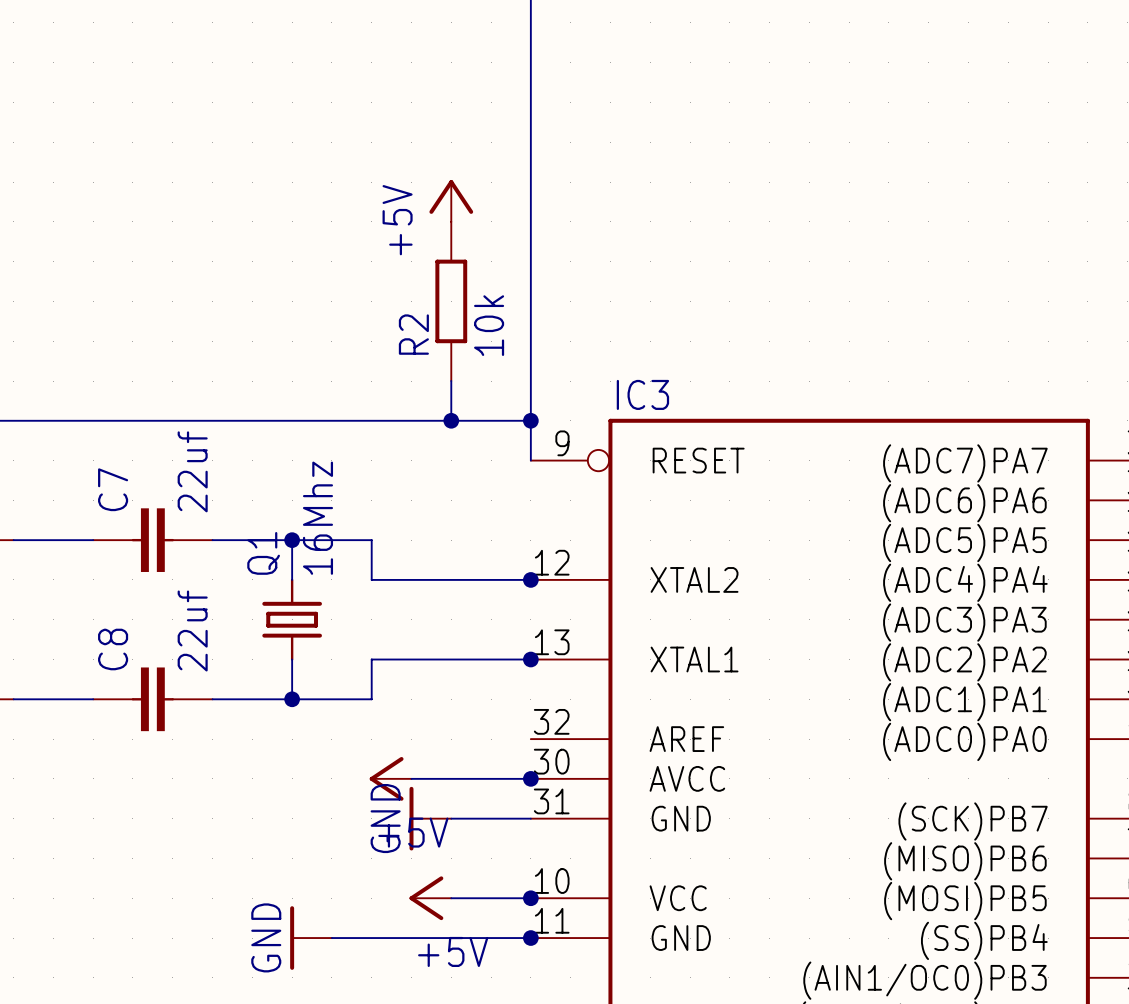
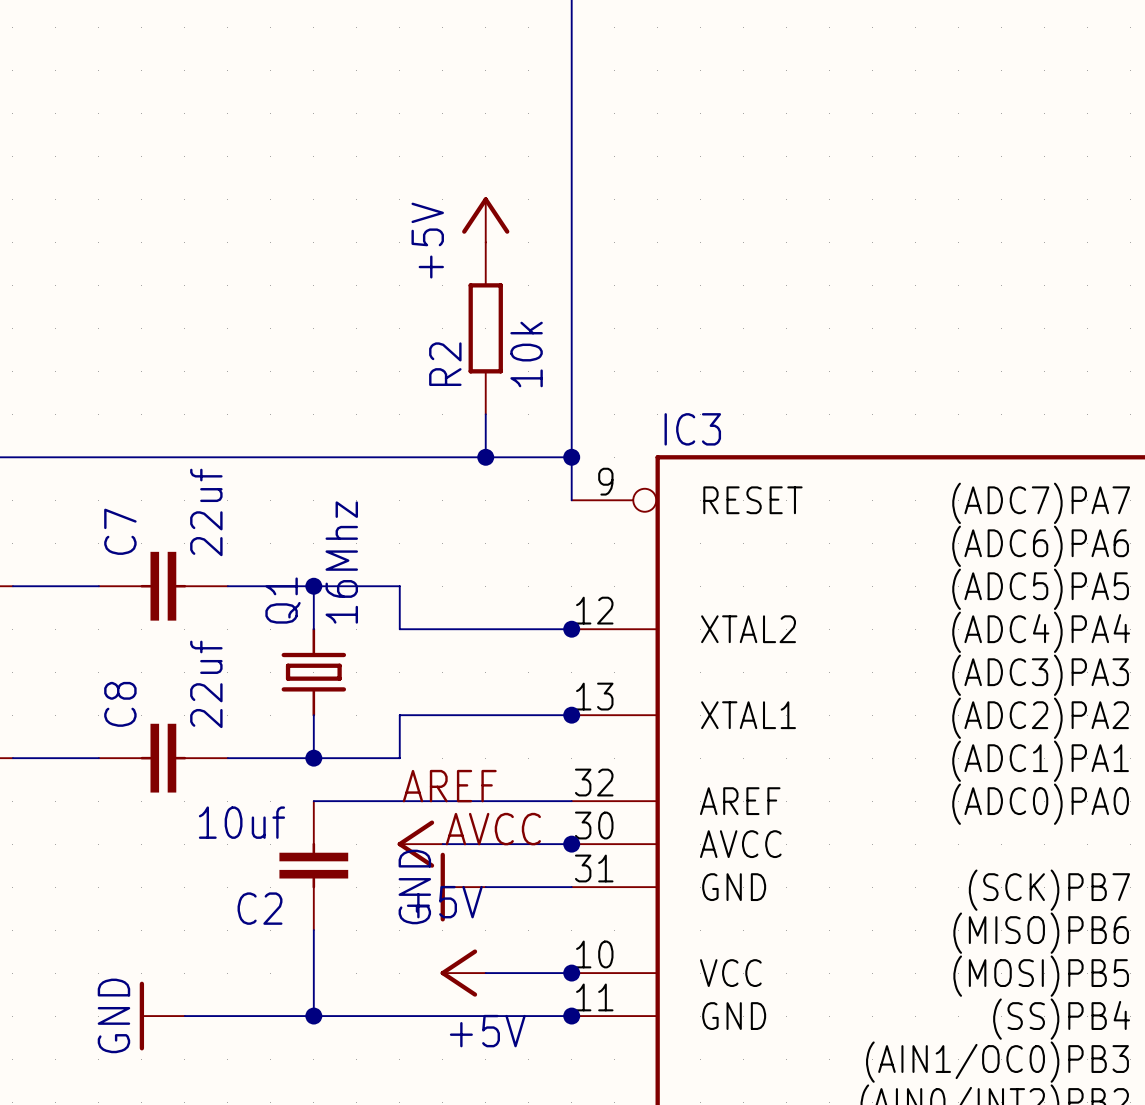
label: none -> AREF (449, 786)
wire: none -> (313, 801) (571, 801)
label: none -> AVCC (493, 829)
C2: none -> 10uf (313, 865)
wire: none -> (313, 930) (313, 1016)
wire: none -> (184, 1016) (356, 1016)
junction: none -> (313, 1016)
power symbol position: GND (311, 938) -> GND (162, 1016)

